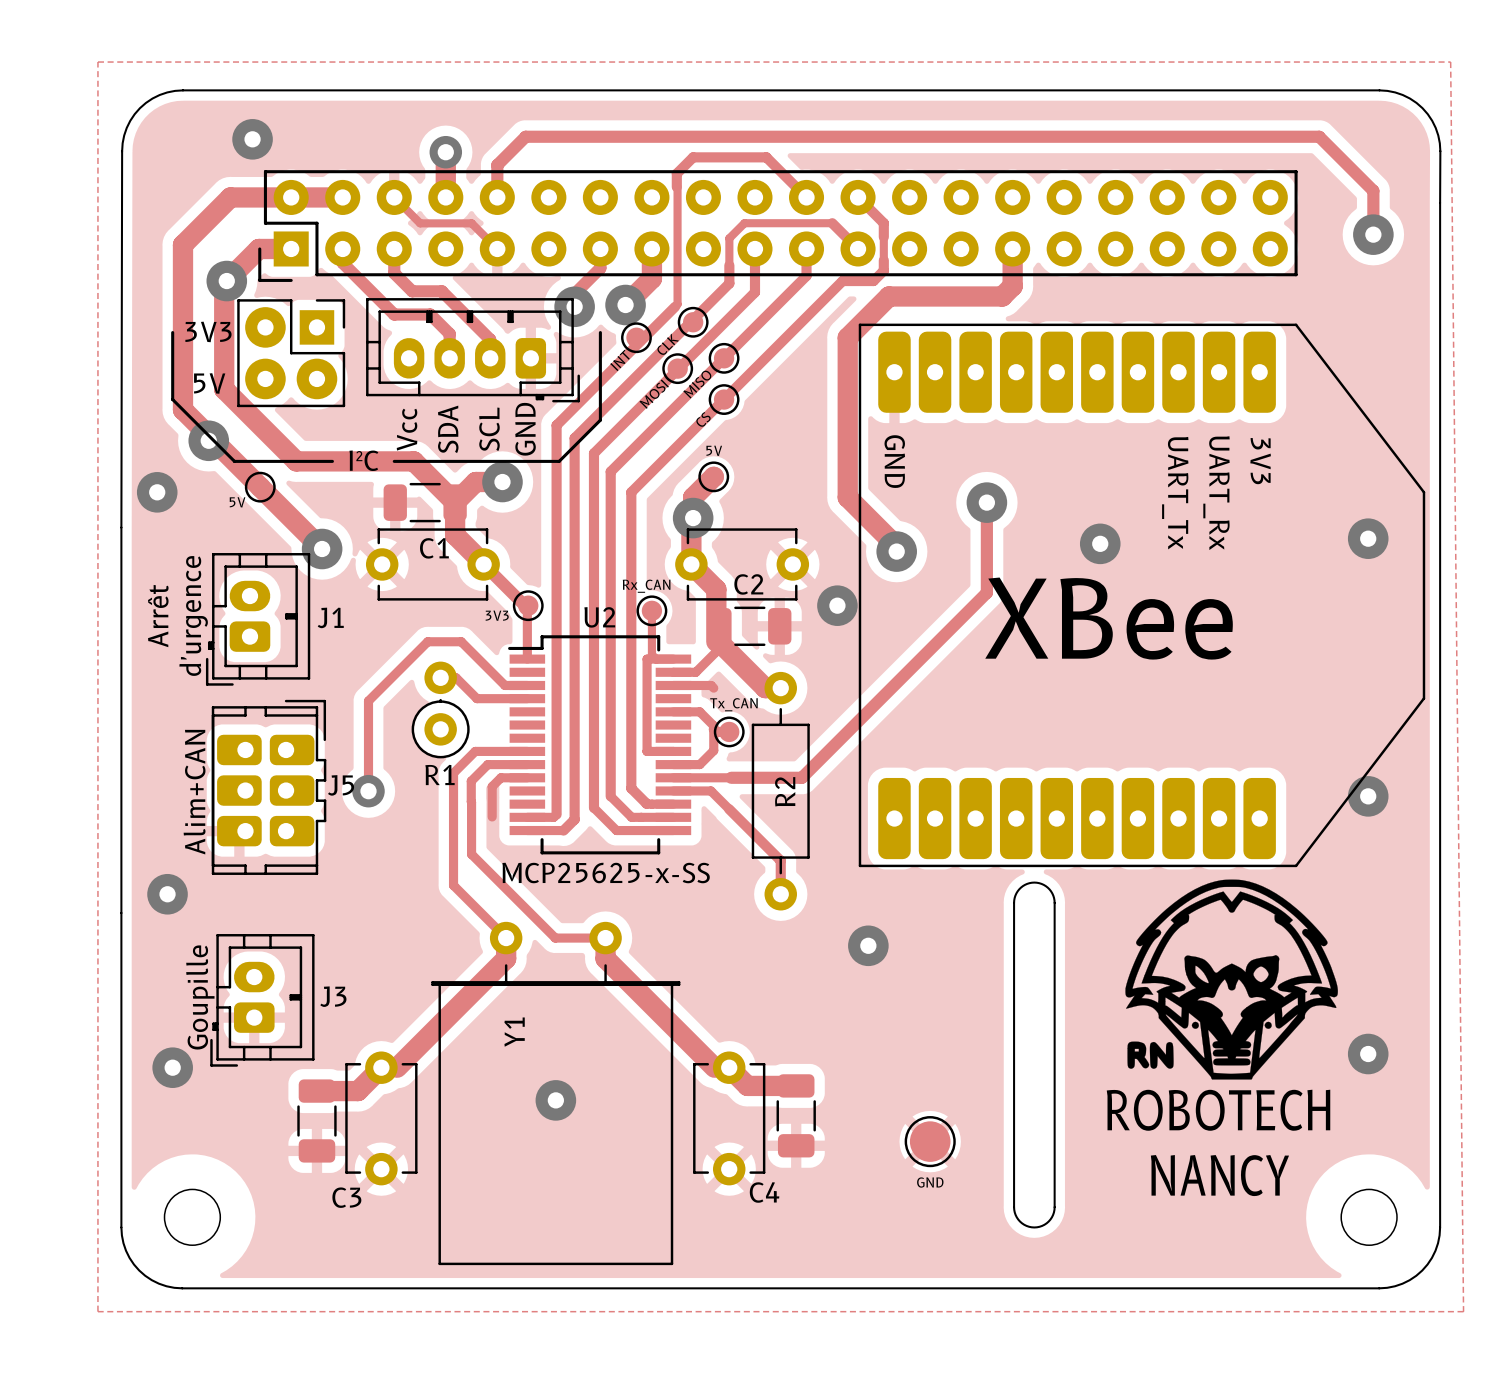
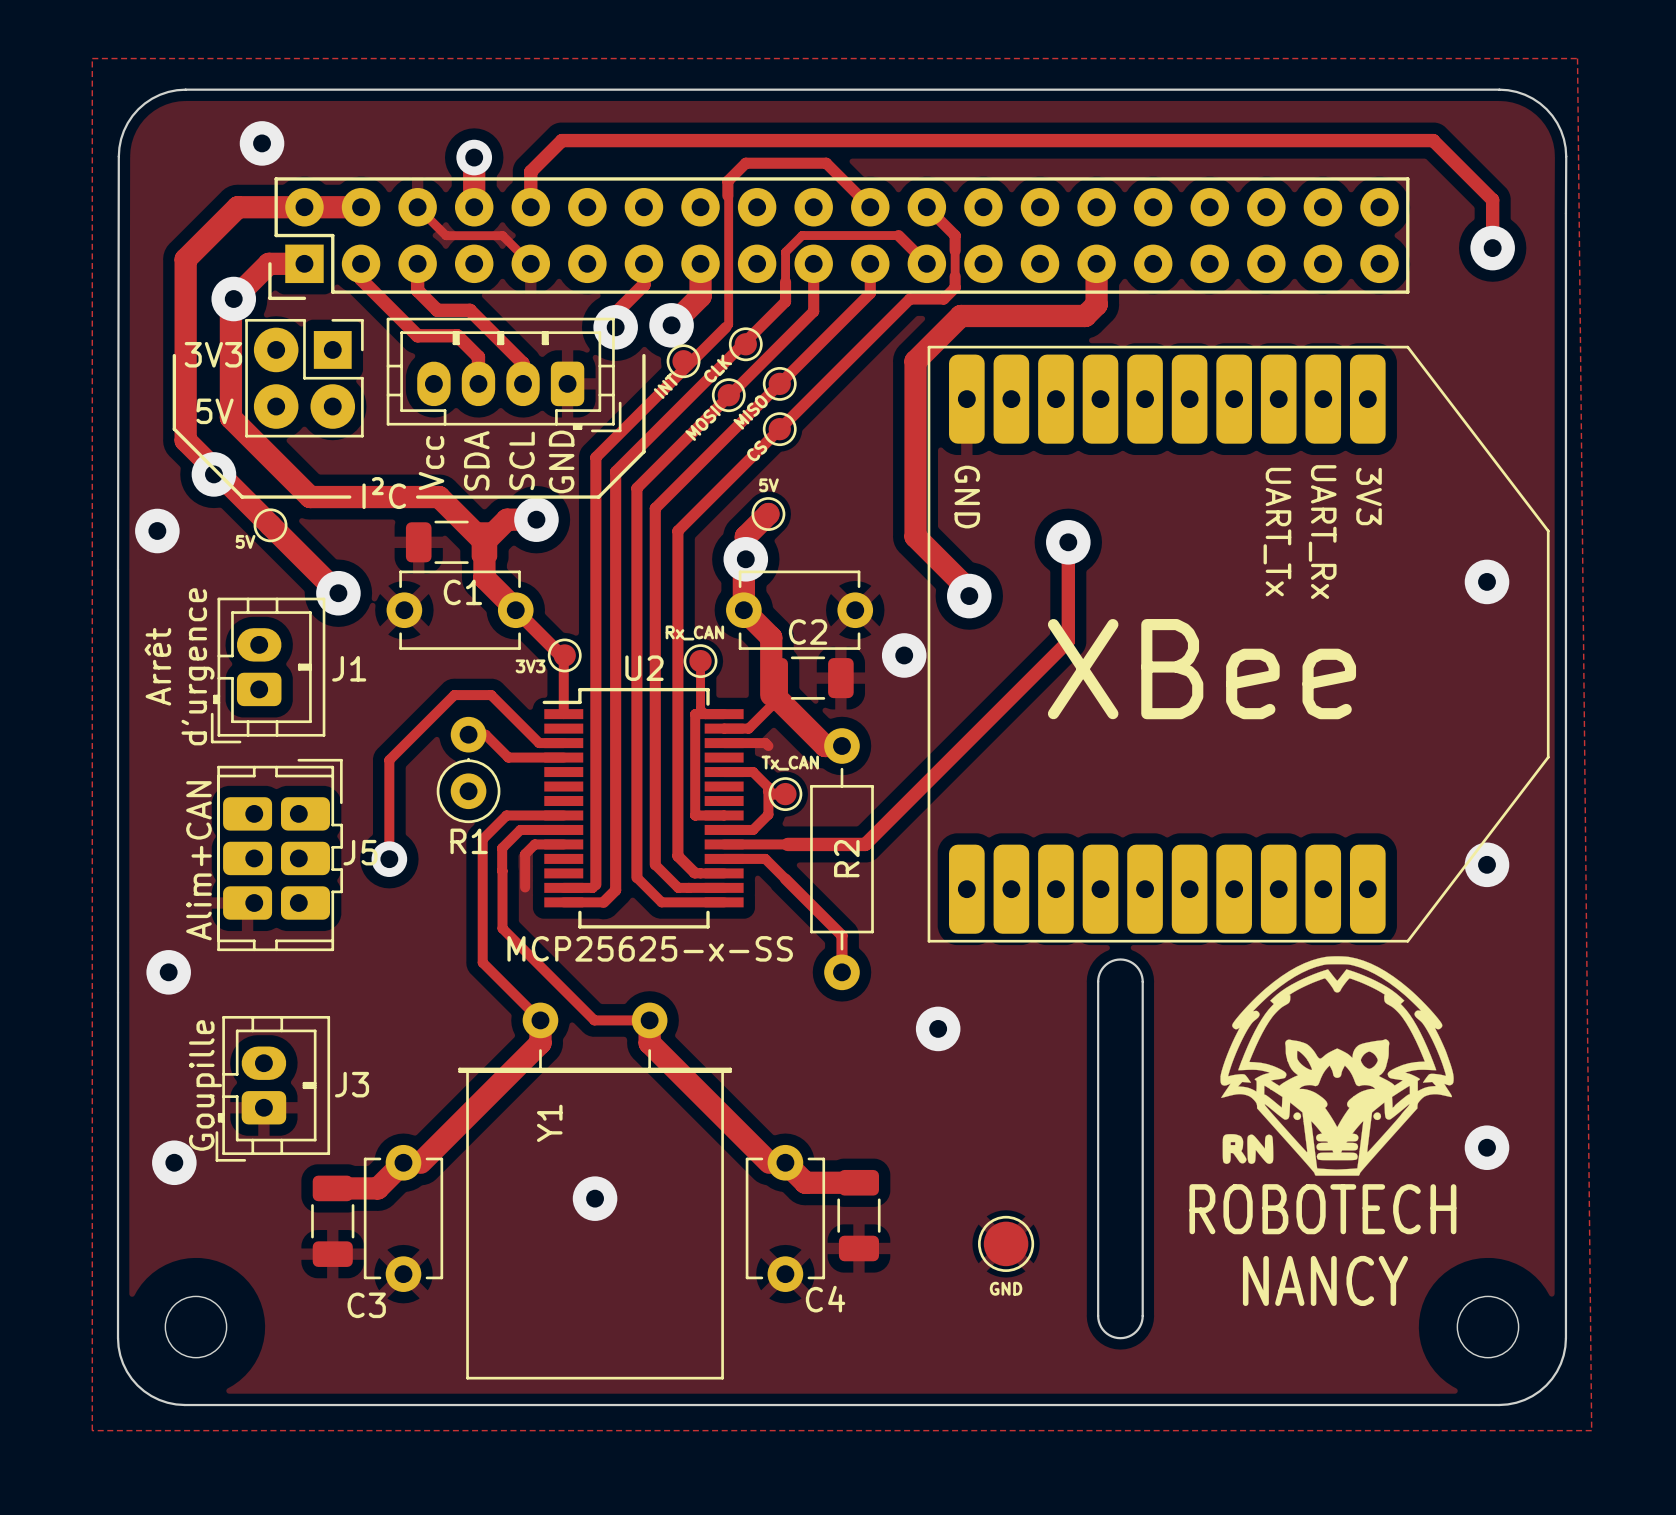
via: (1100, 543) -> none

